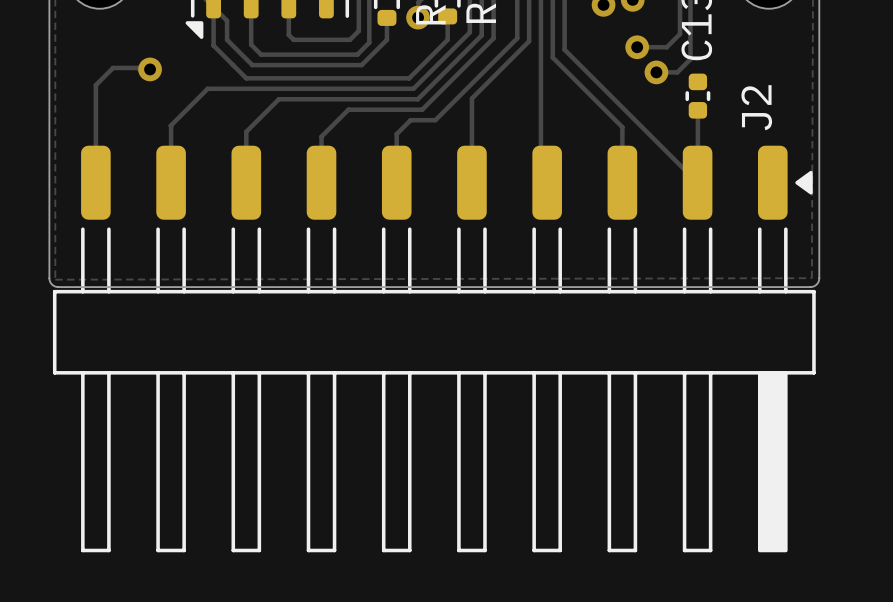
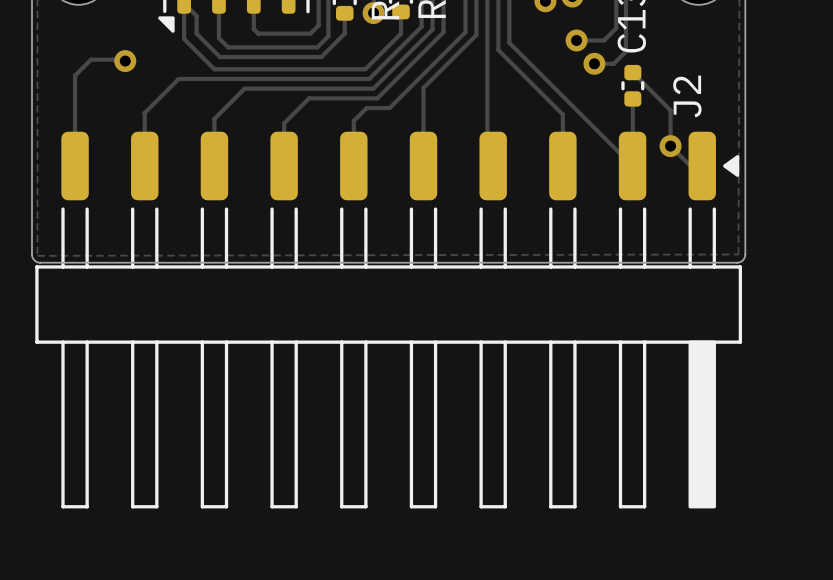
track: none -> (632, 72) (670, 110) (670, 146) (690, 166) (702, 166)
via: none -> (670, 146)

